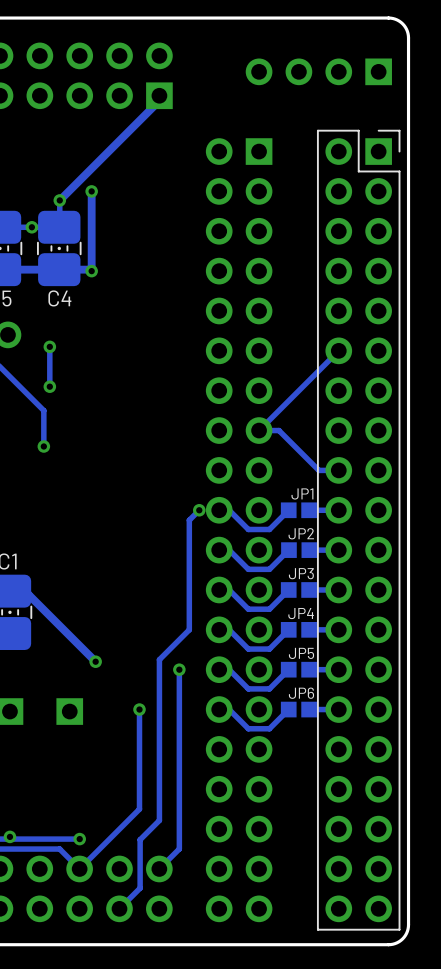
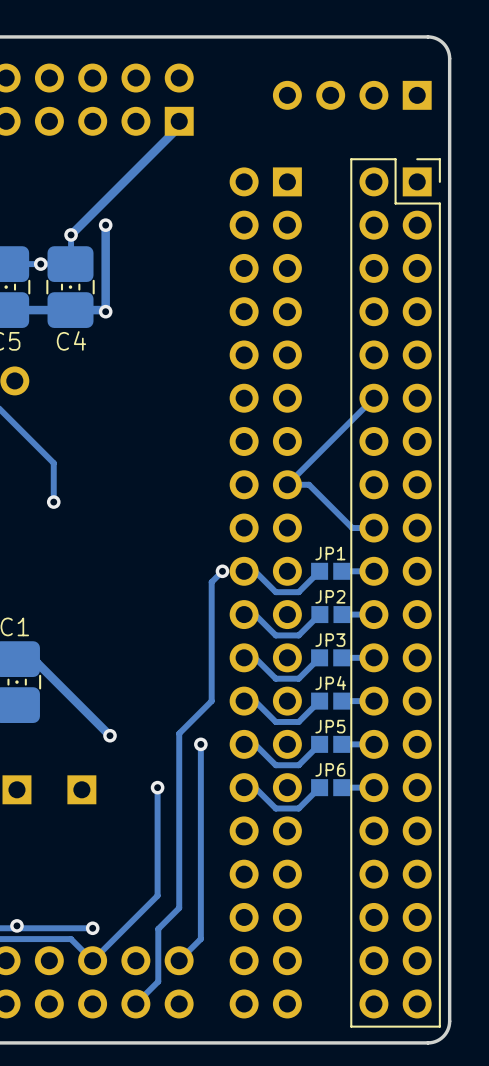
track: (49, 346) (49, 386) -> none
via: (49, 346) -> none
via: (49, 386) -> none

